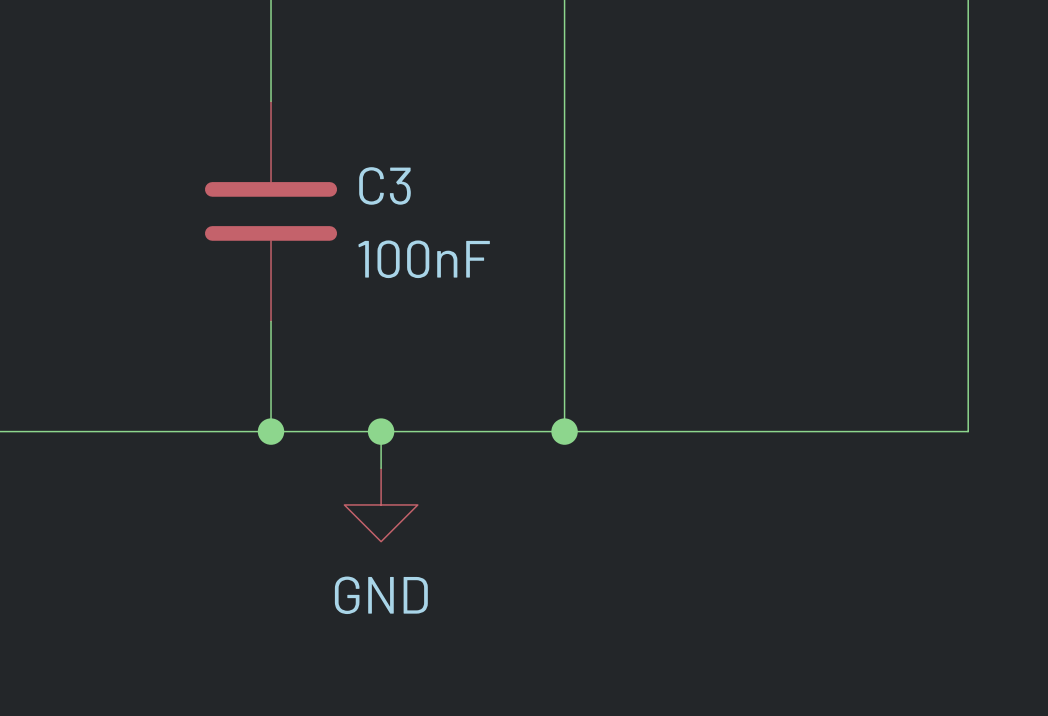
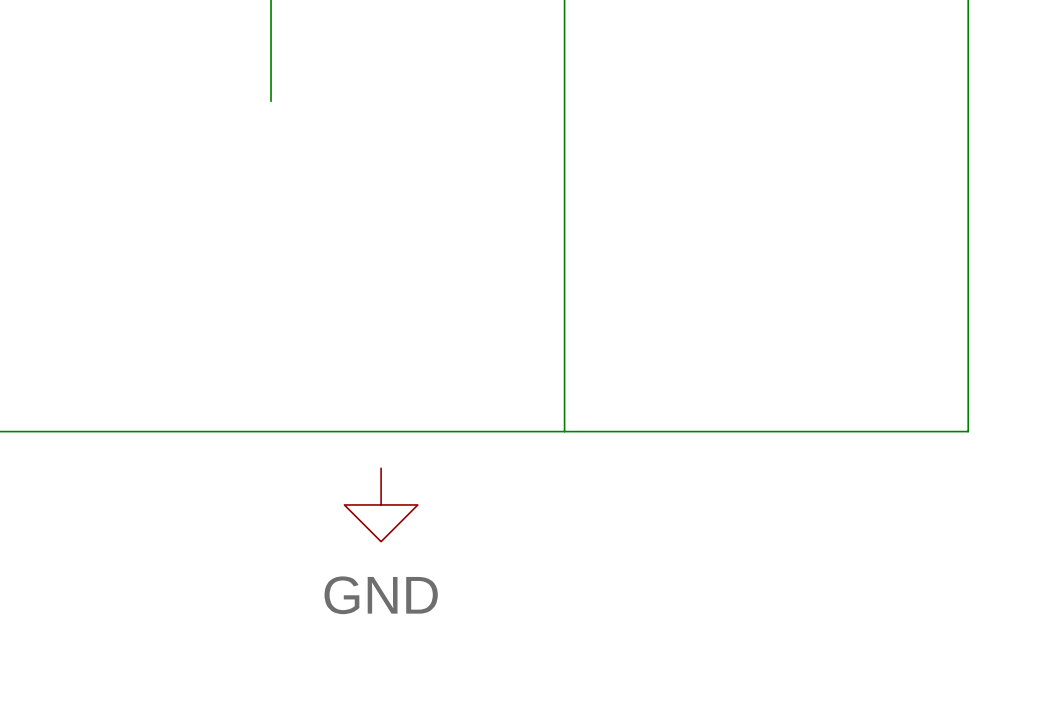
C3: 100nF (271, 211) -> none
wire: (271, 321) (271, 431) -> none
junction: (271, 431) -> none
wire: (381, 431) (381, 468) -> none
junction: (381, 431) -> none
junction: (564, 431) -> none

